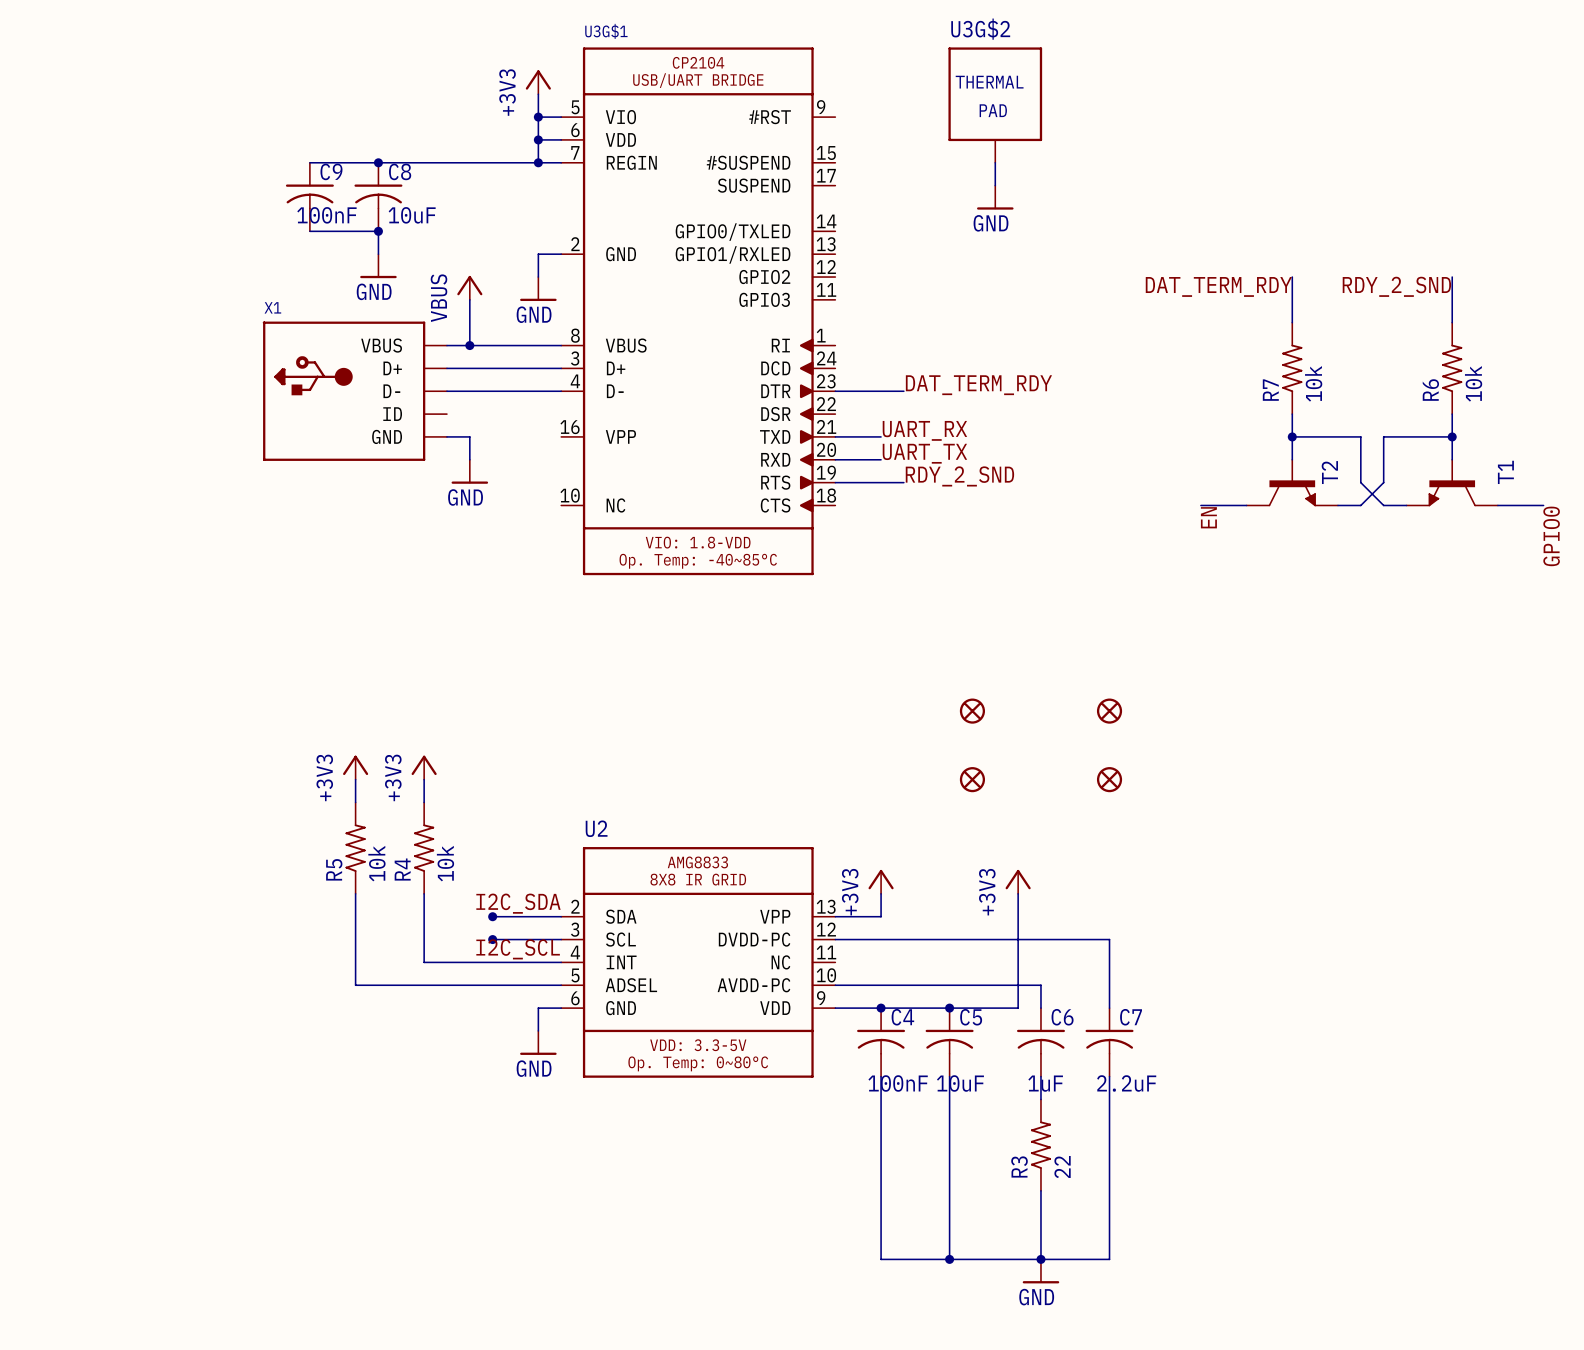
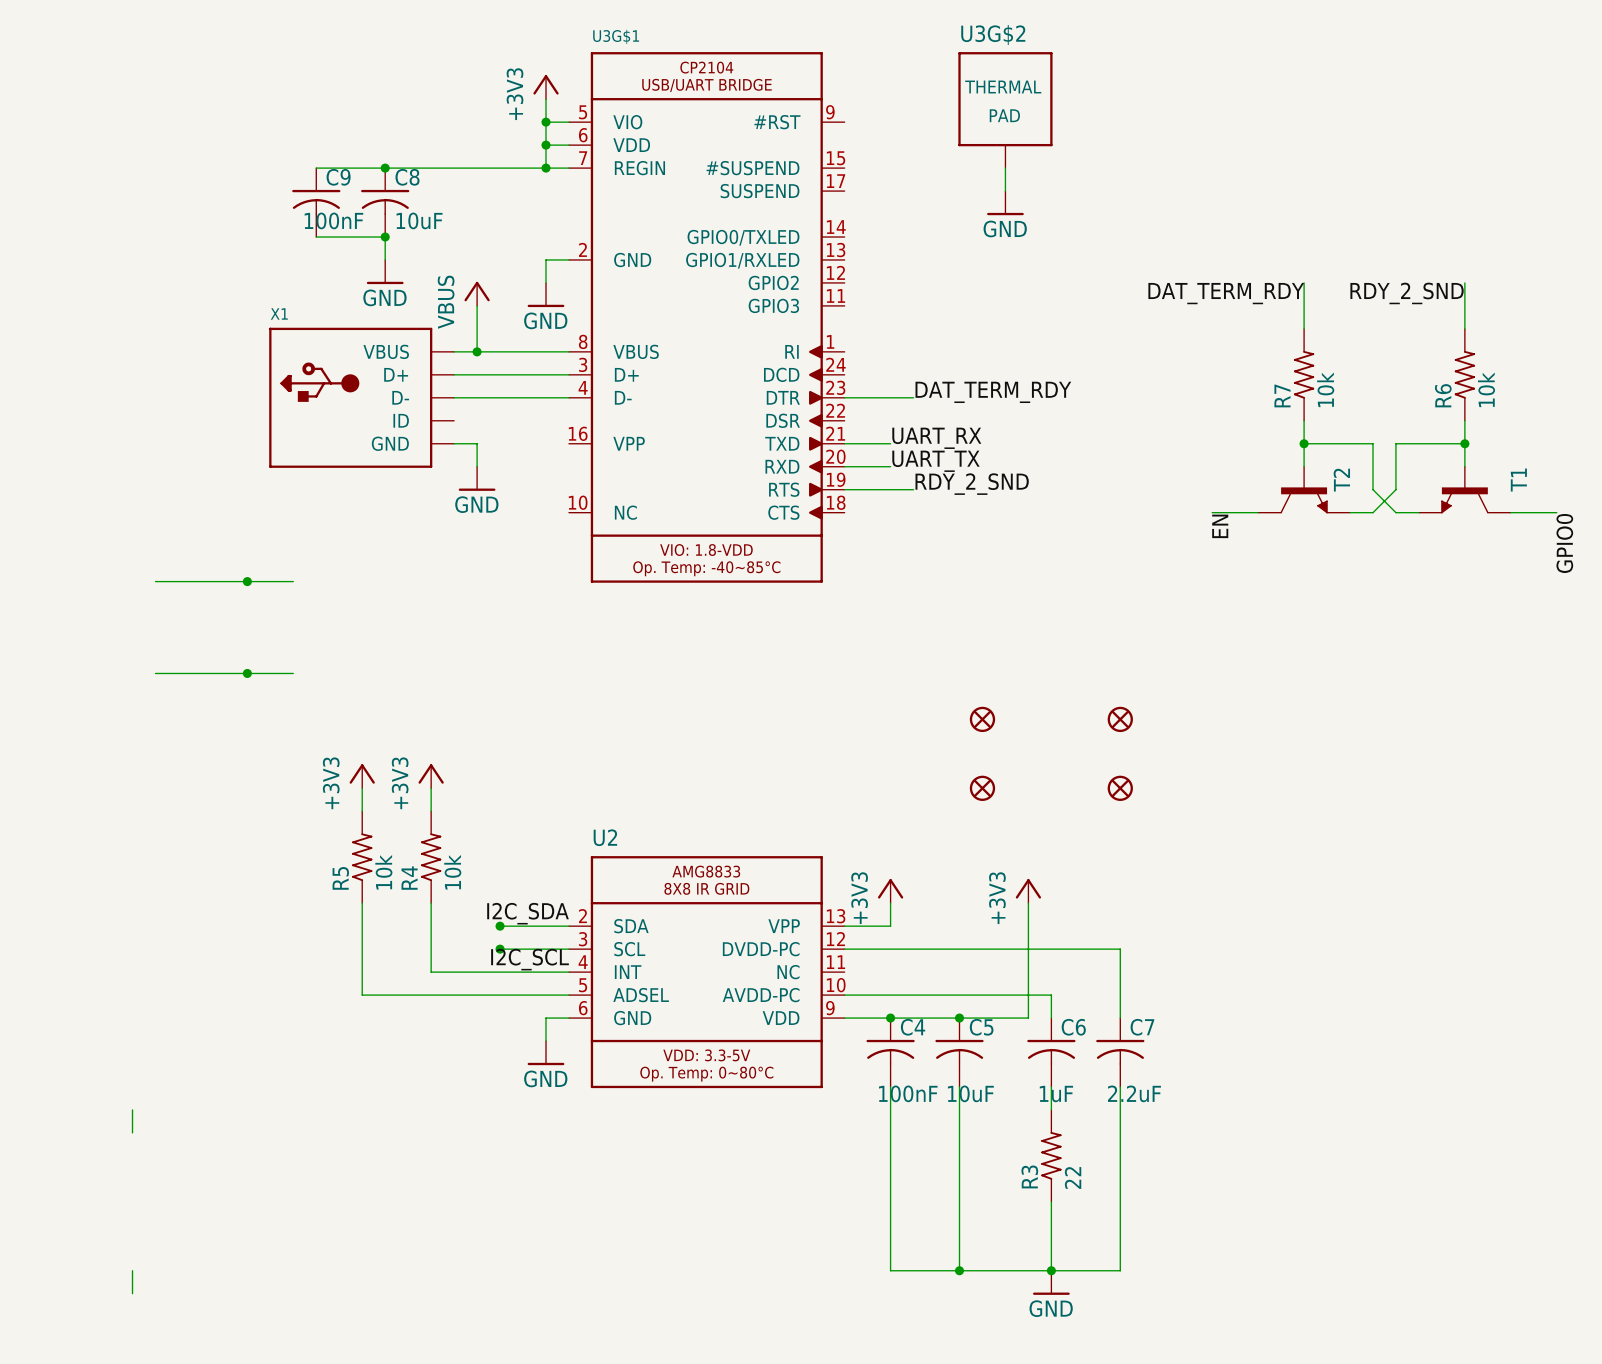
wire: none -> (155, 581) (293, 581)
junction: none -> (247, 581)
wire: none -> (155, 673) (293, 673)
junction: none -> (247, 673)
wire: none -> (132, 1109) (132, 1132)
wire: none -> (132, 1270) (132, 1293)

